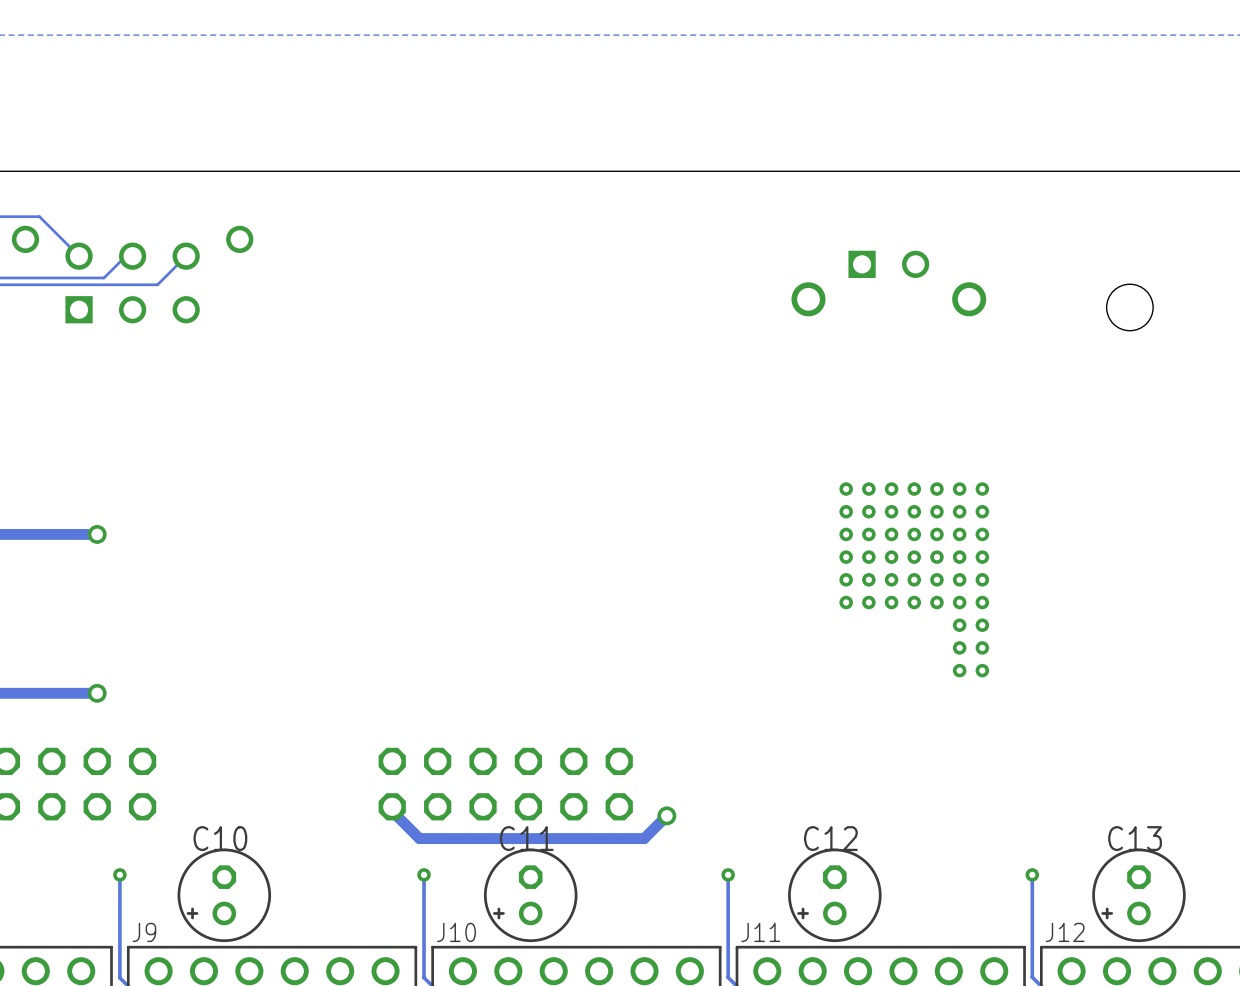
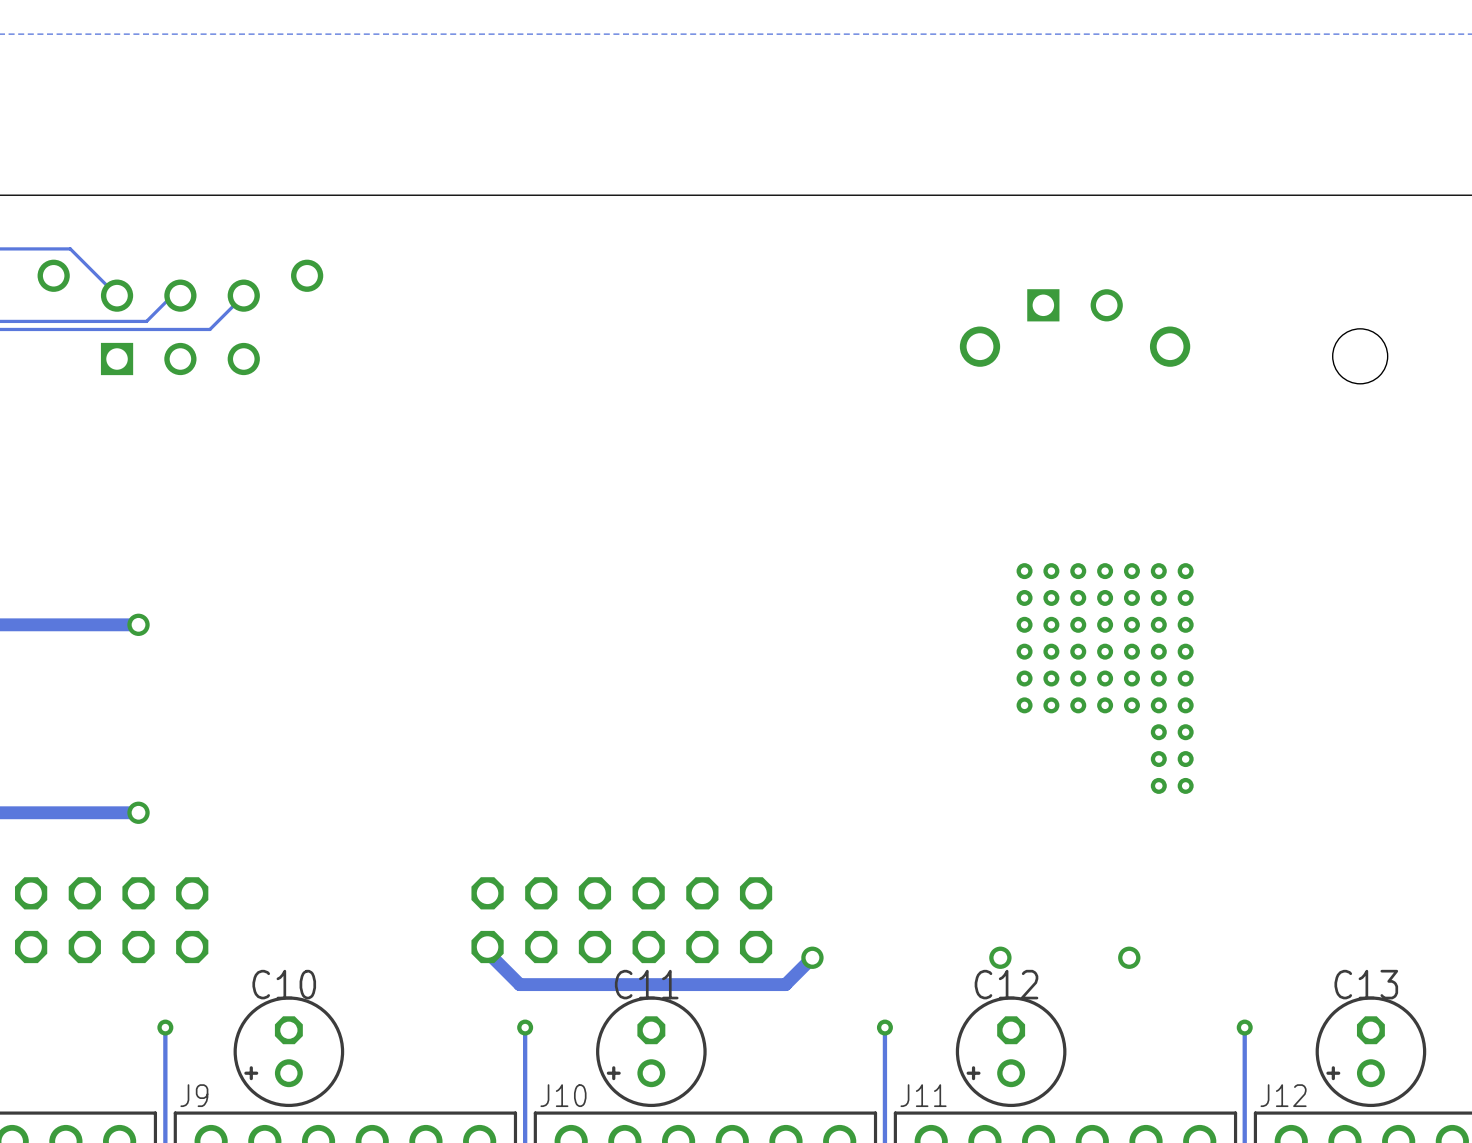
via: none -> (1000, 957)
via: none -> (1129, 957)

